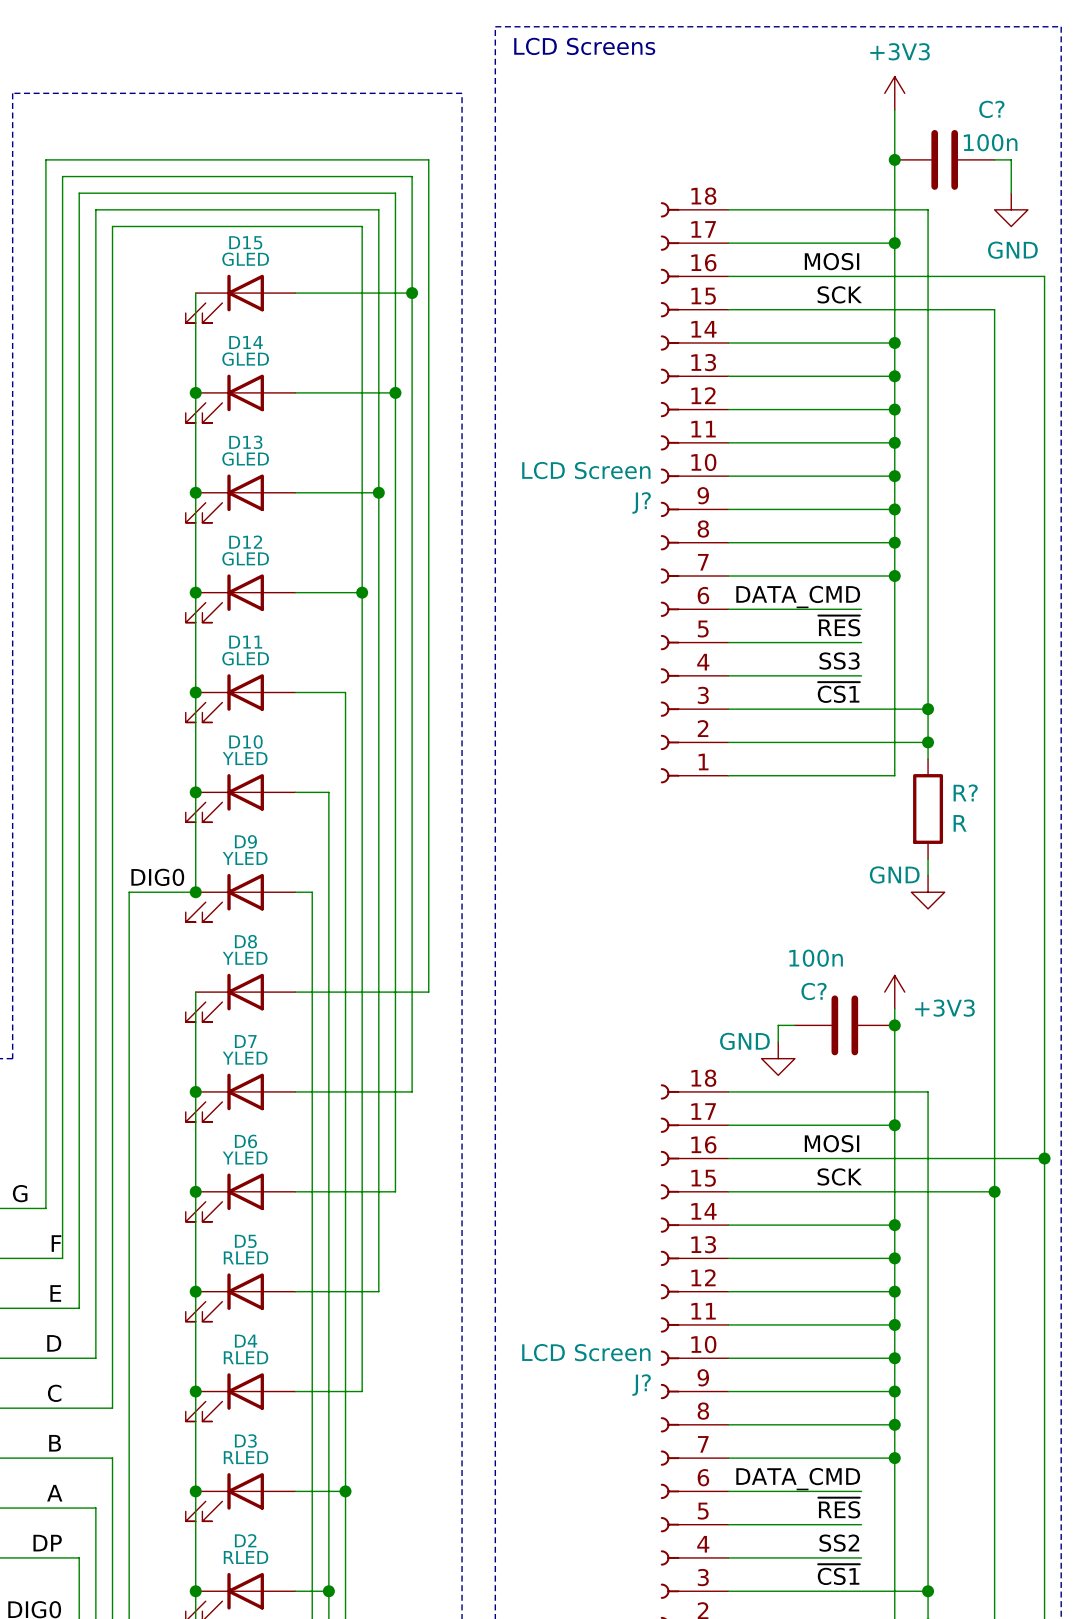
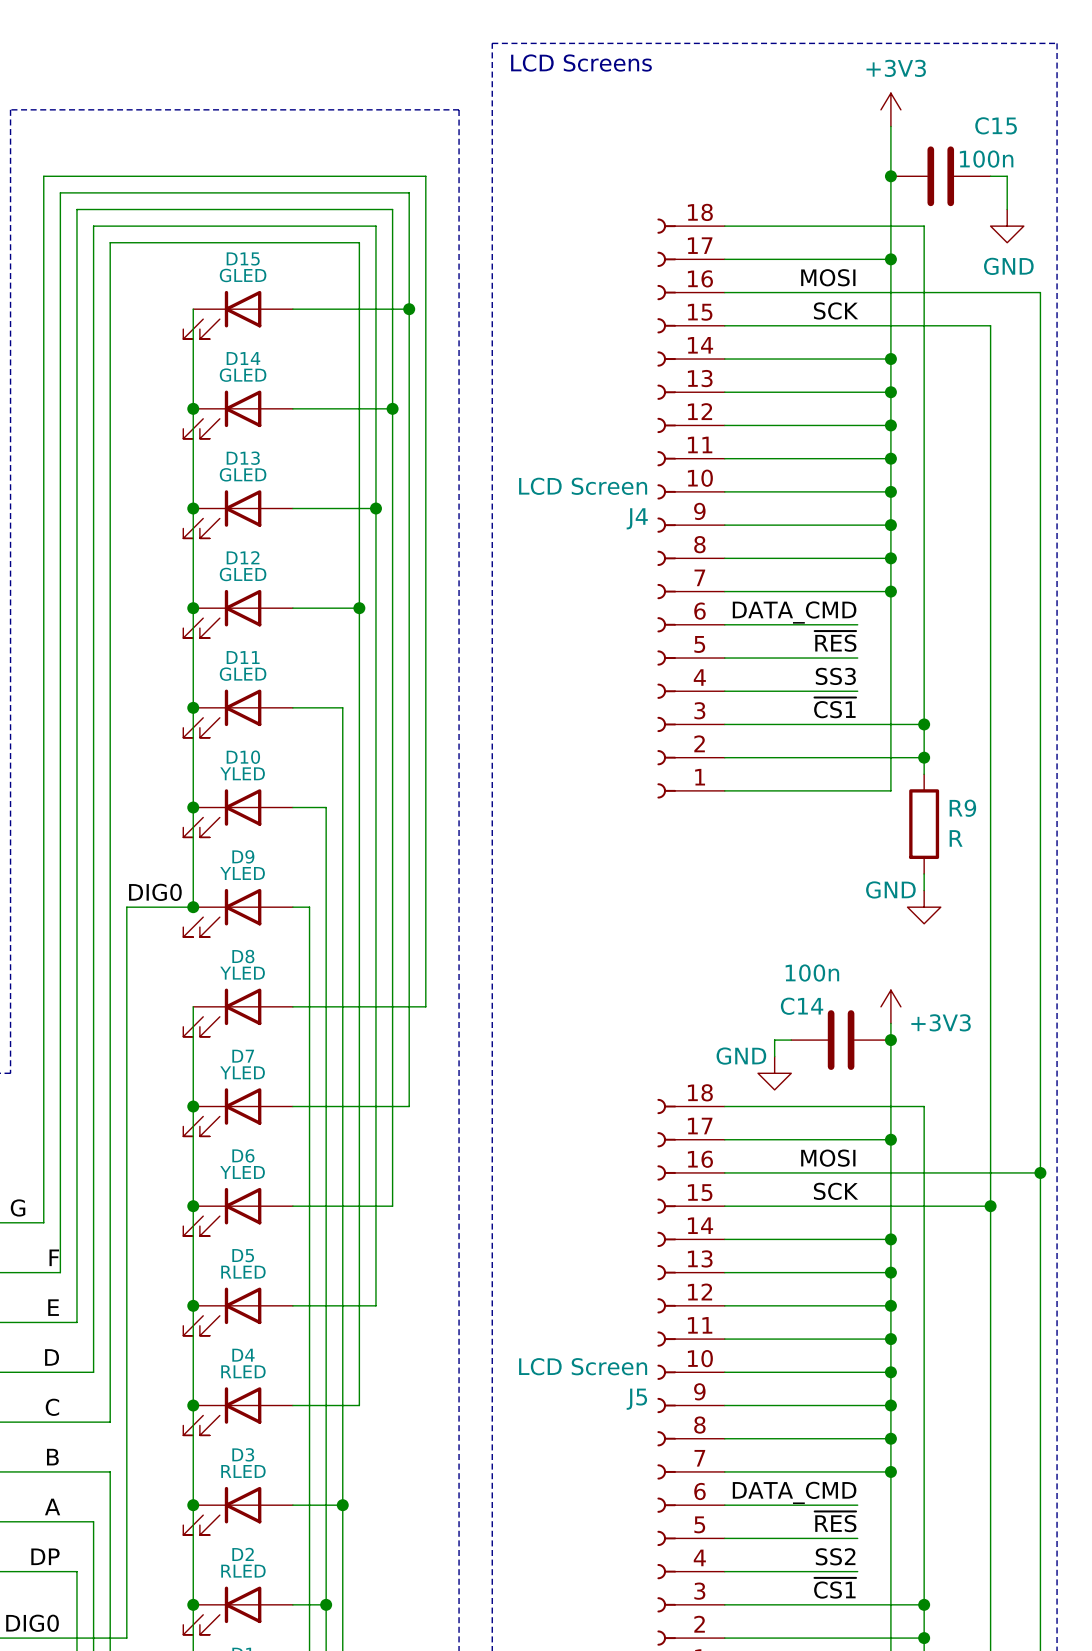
C? name: C? (991, 109) -> C15 (996, 125)
J? name: J? (641, 502) -> J4 (637, 518)
R? name: R? (965, 792) -> R9 (962, 808)
C? name: C? (814, 991) -> C14 (802, 1006)
J? name: J? (641, 1385) -> J5 (636, 1399)

